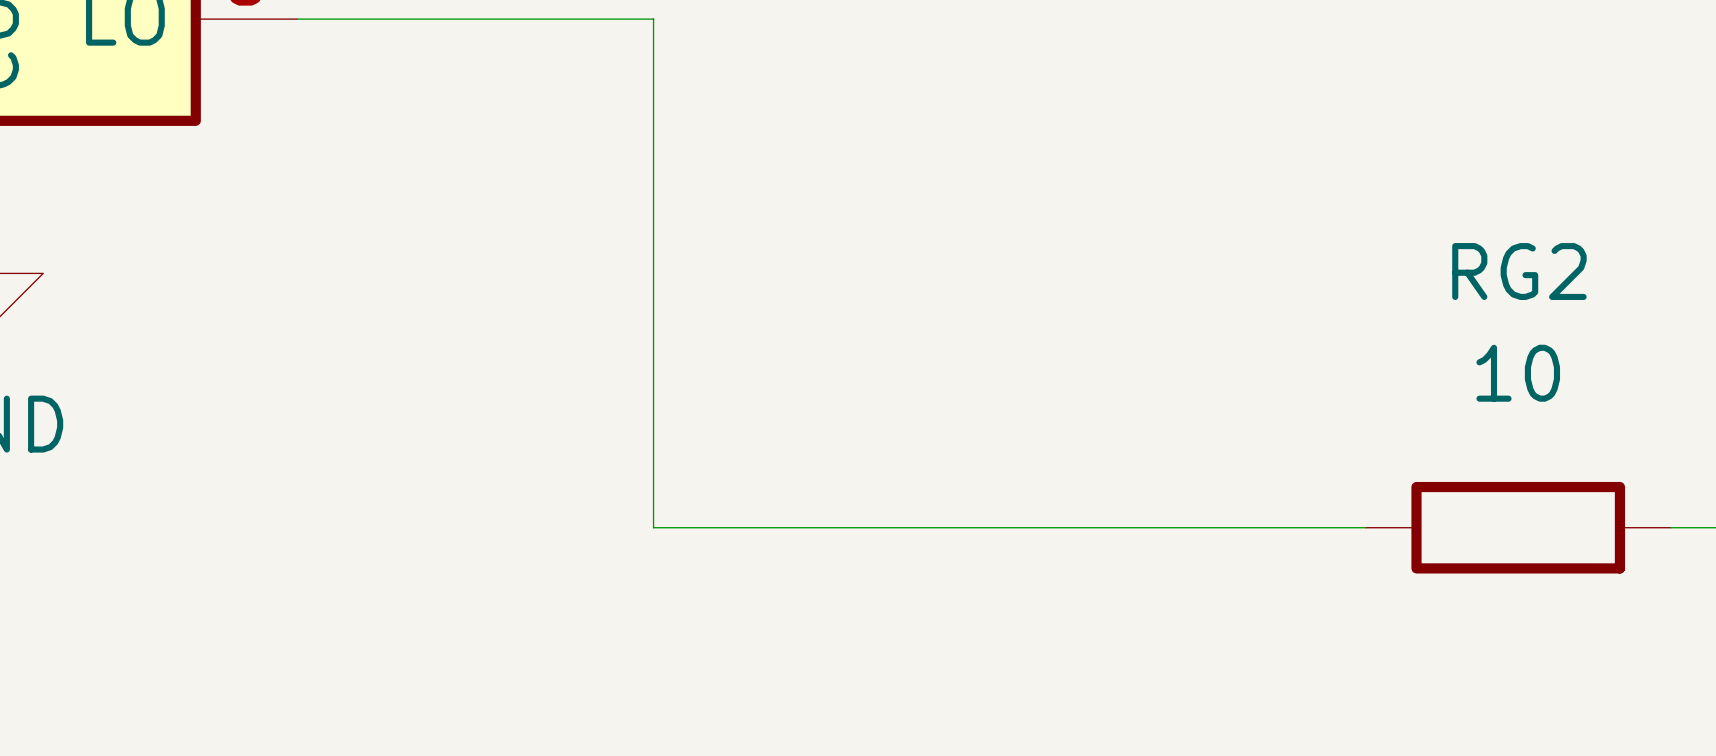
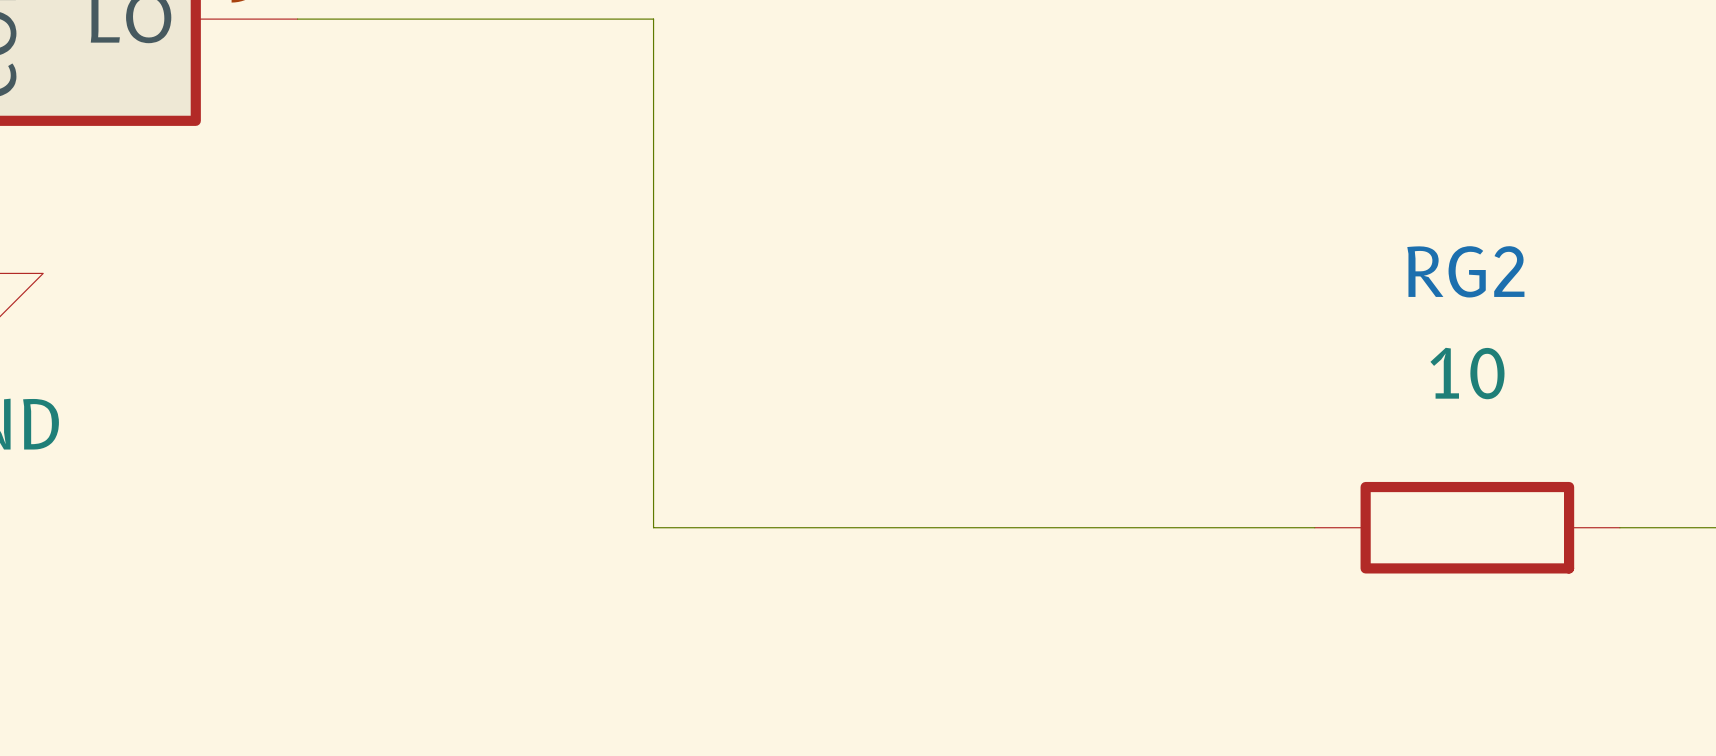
RG2 position: (1518, 527) -> (1467, 527)

